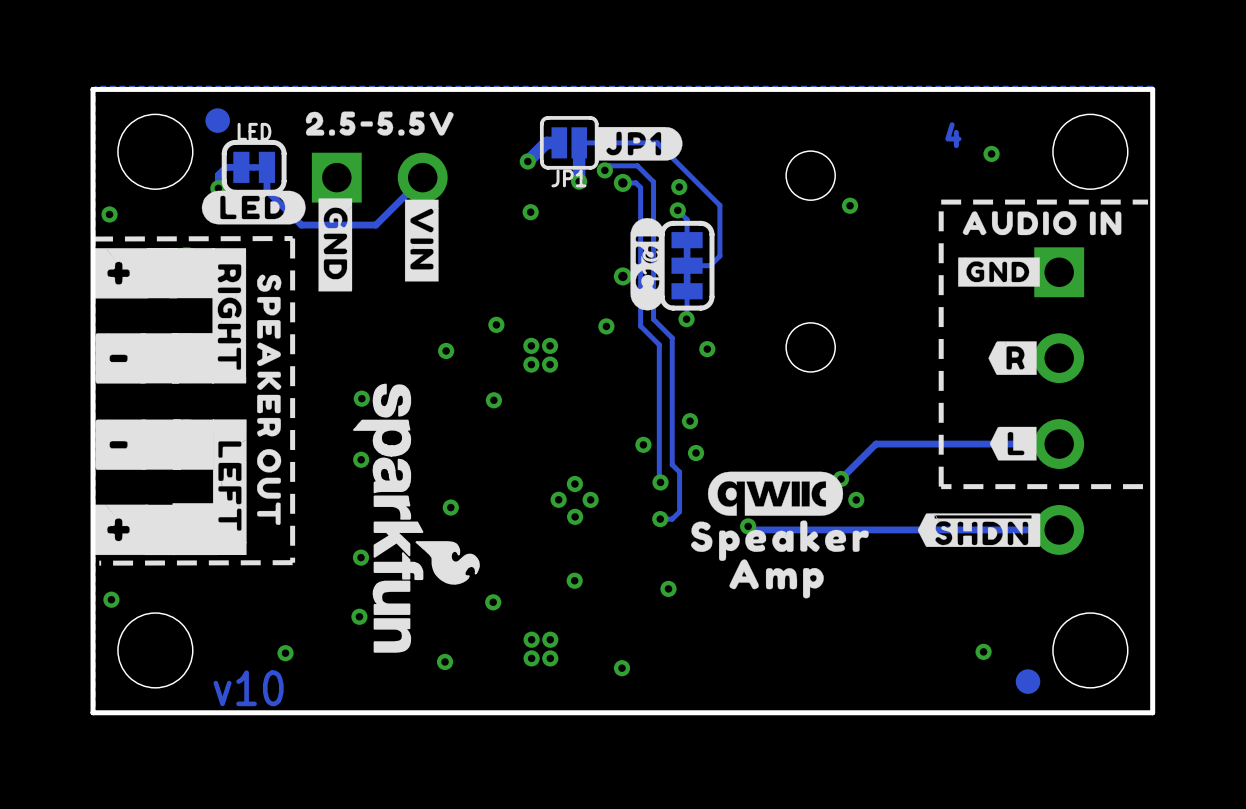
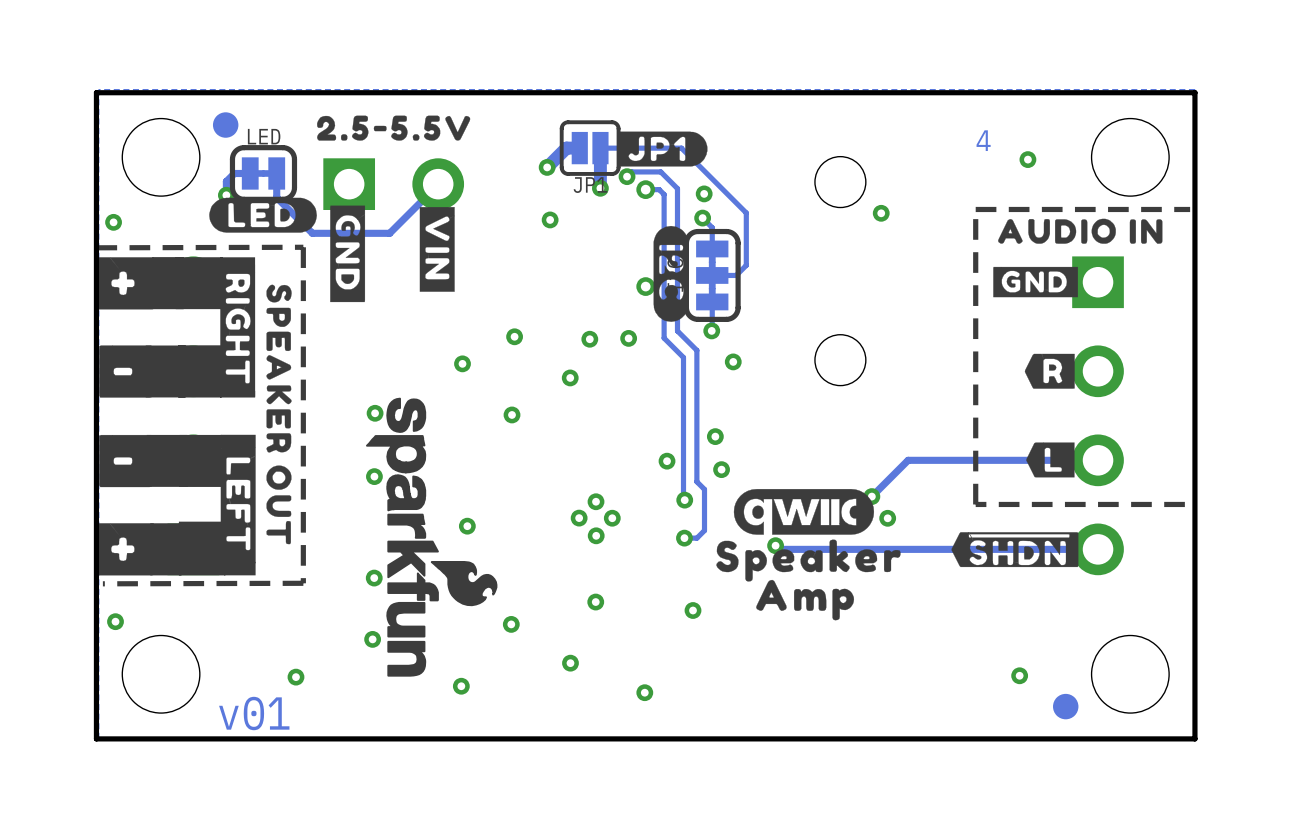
via: none -> (589, 339)
via: (531, 345) -> none
via: (550, 345) -> none
via: (531, 364) -> none
via: (531, 639) -> none
via: (531, 658) -> none
via: (550, 658) -> none
text: v10 (248, 688) -> v01 (254, 713)

